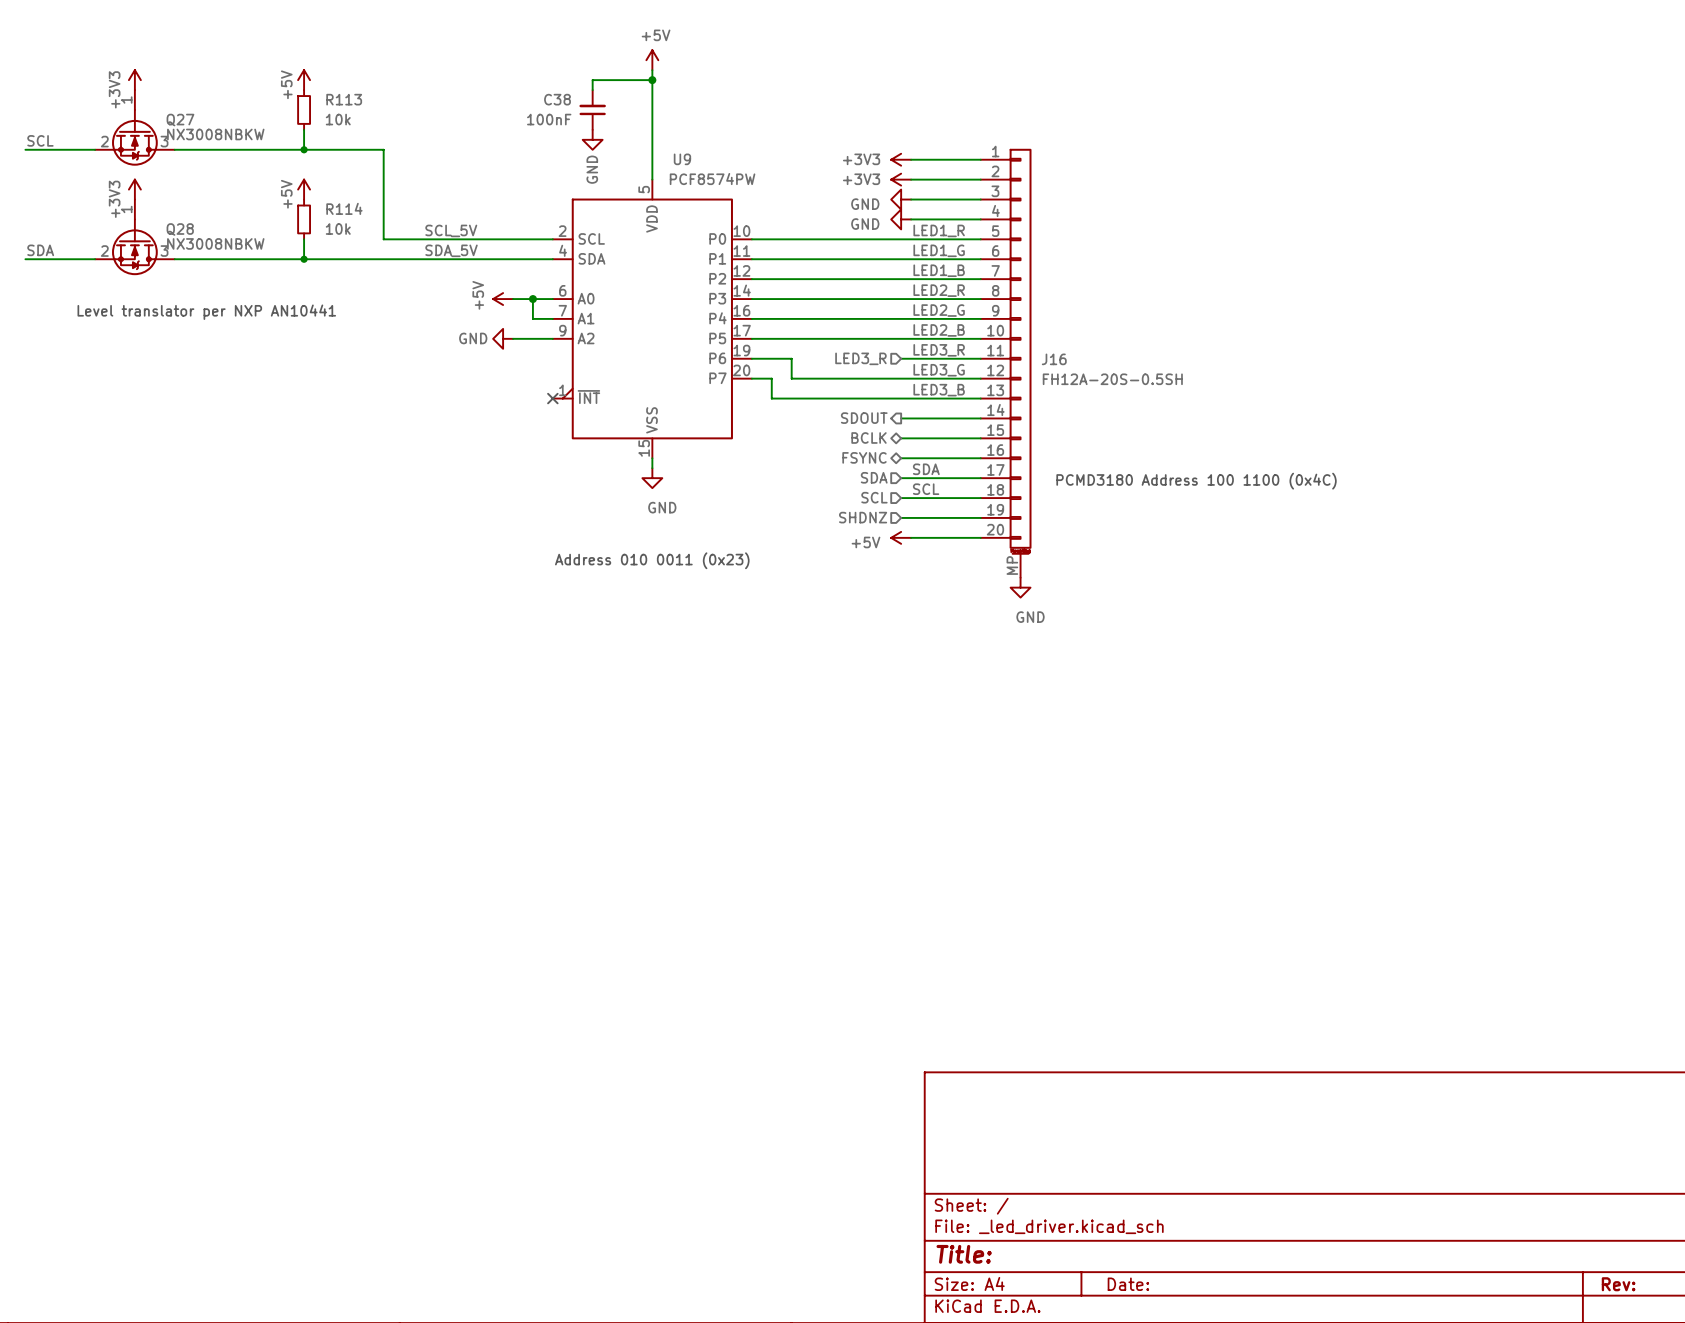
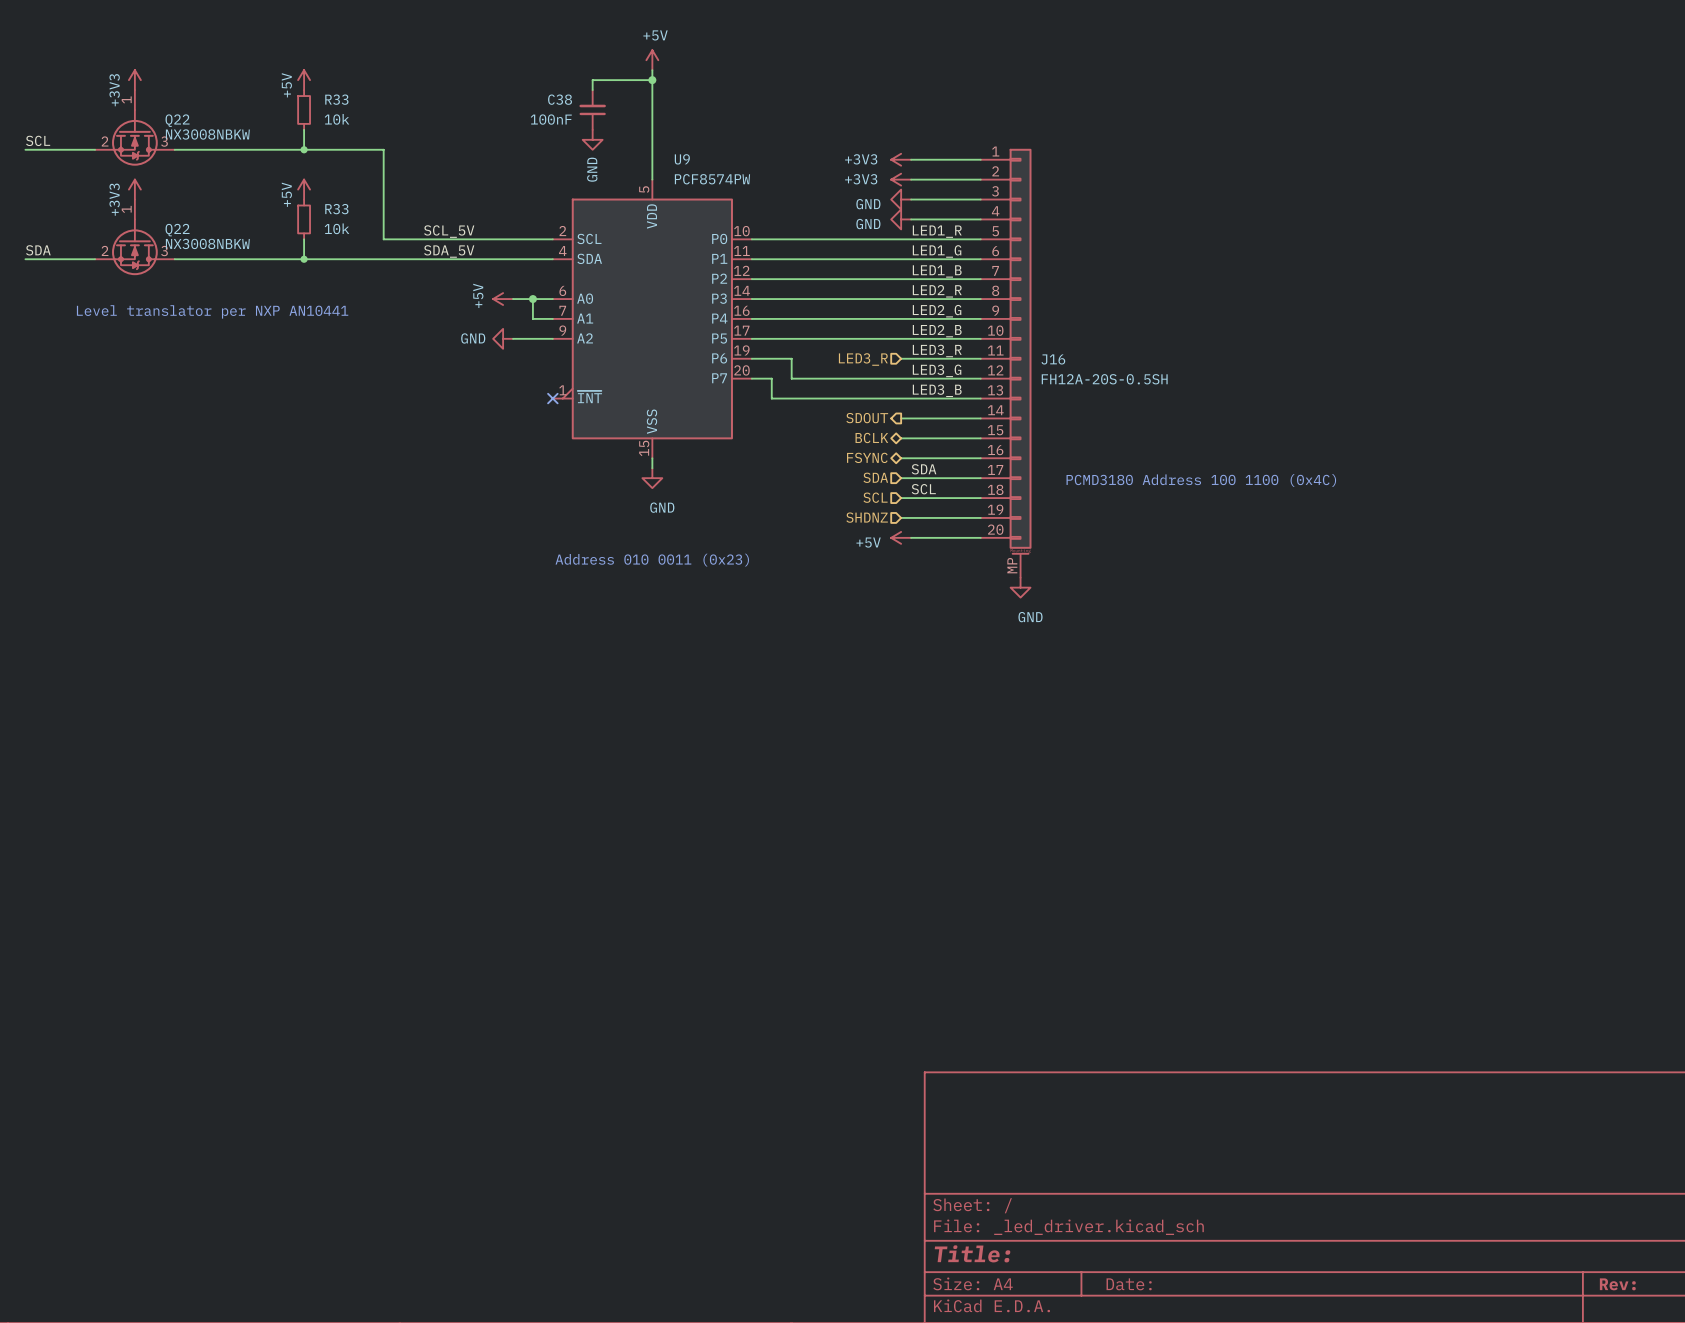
R113 name: R113 (344, 99) -> R33 (336, 99)
Q27 name: Q27 (180, 120) -> Q22 (177, 120)
R114 name: R114 (344, 208) -> R33 (336, 209)
Q28 name: Q28 (180, 229) -> Q22 (177, 230)

